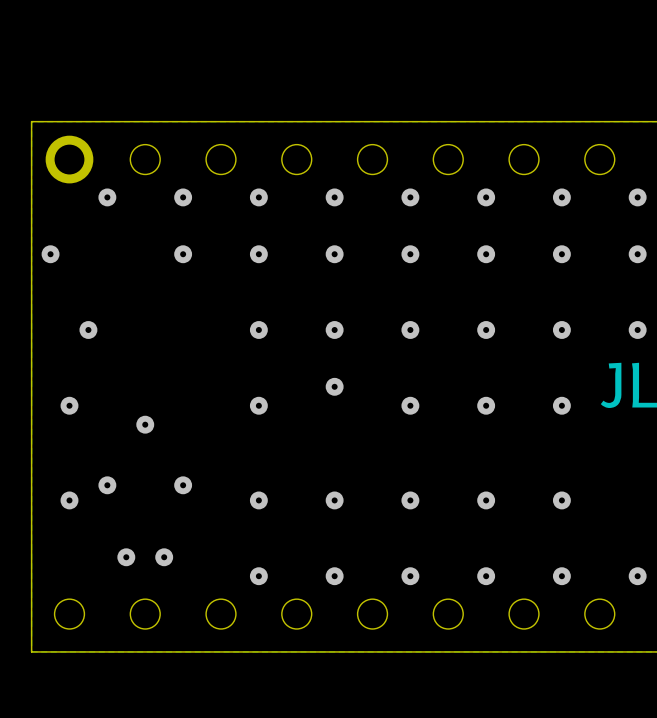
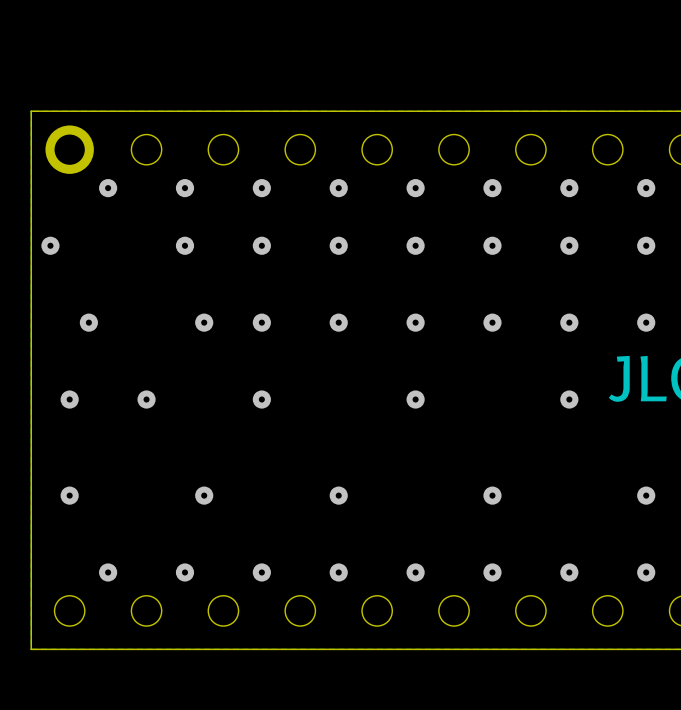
via: none -> (204, 322)
via: (334, 386) -> none
via: (486, 405) -> none
via position: (145, 424) -> (146, 399)
via: (107, 485) -> none
via position: (183, 485) -> (204, 495)
via: (258, 500) -> none
via: (410, 500) -> none
via position: (561, 500) -> (646, 495)
via position: (126, 557) -> (108, 572)
via position: (164, 557) -> (184, 572)

